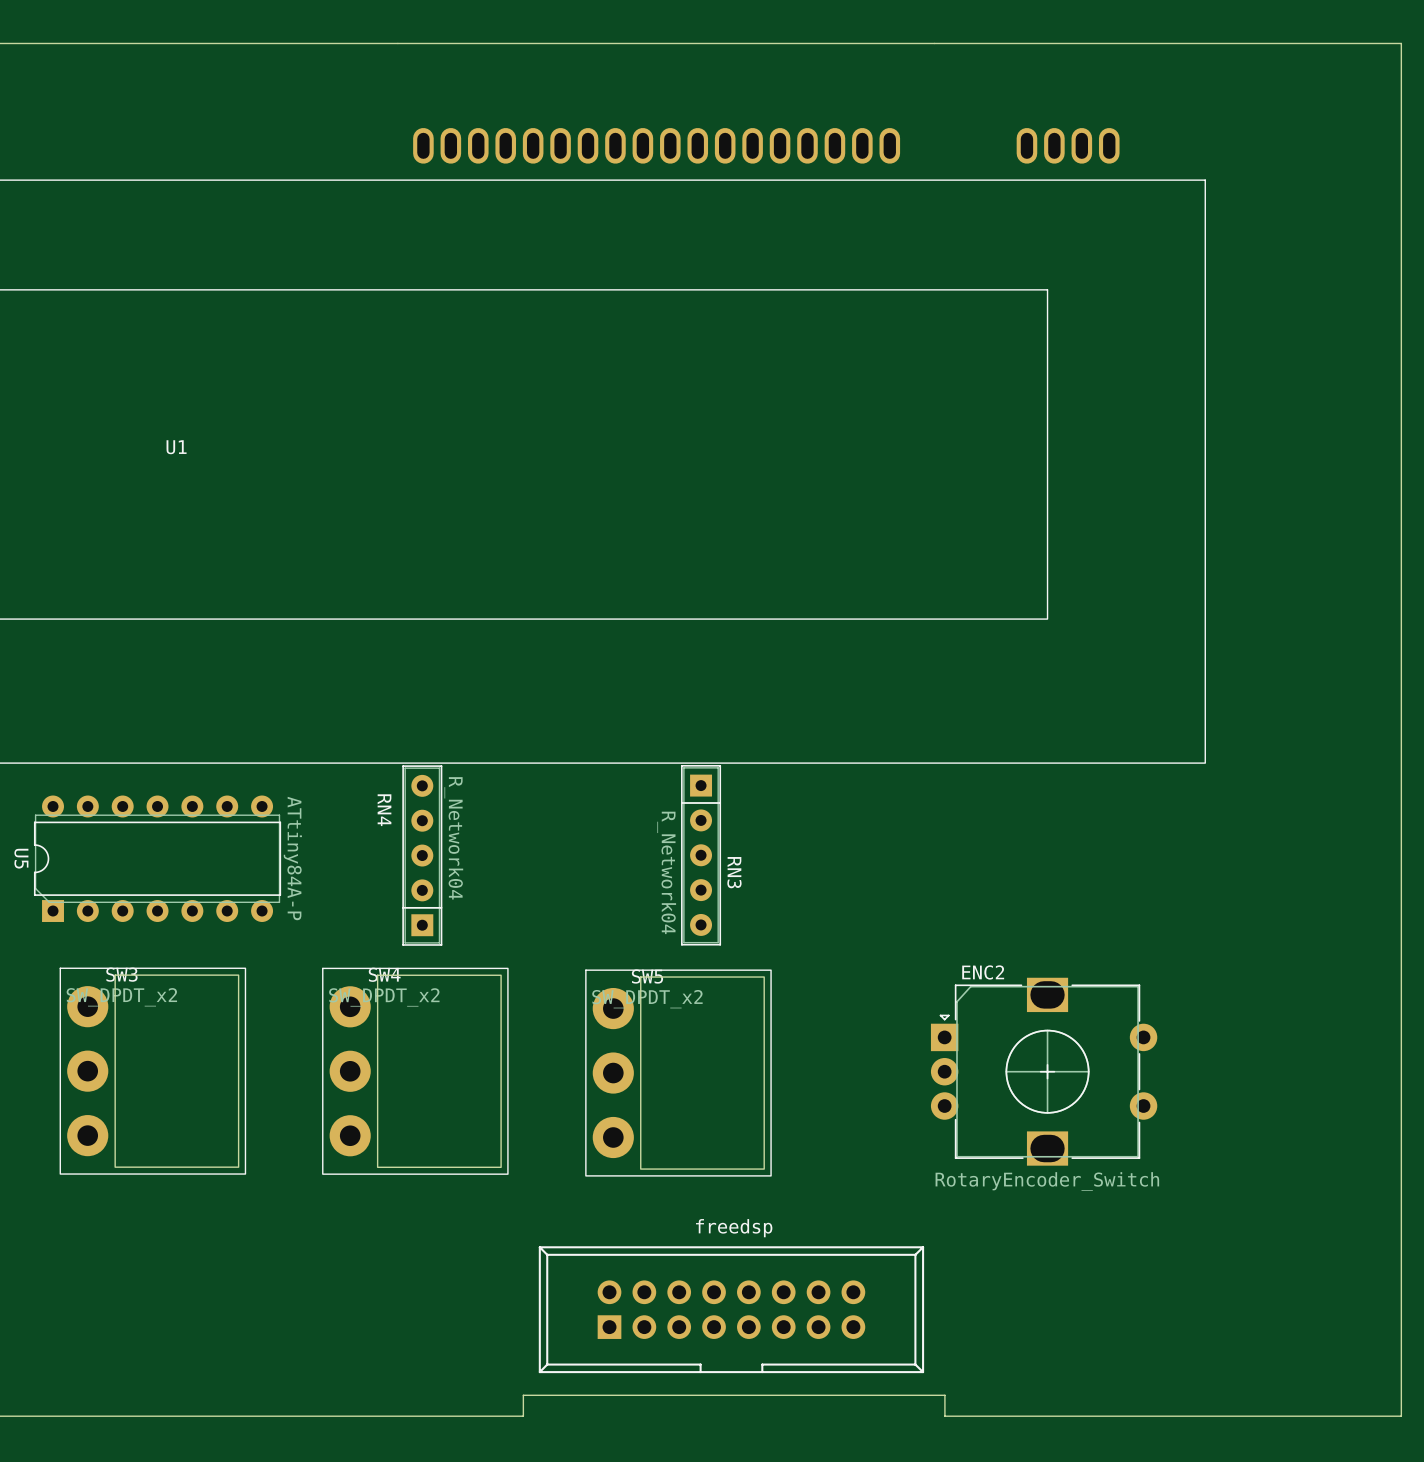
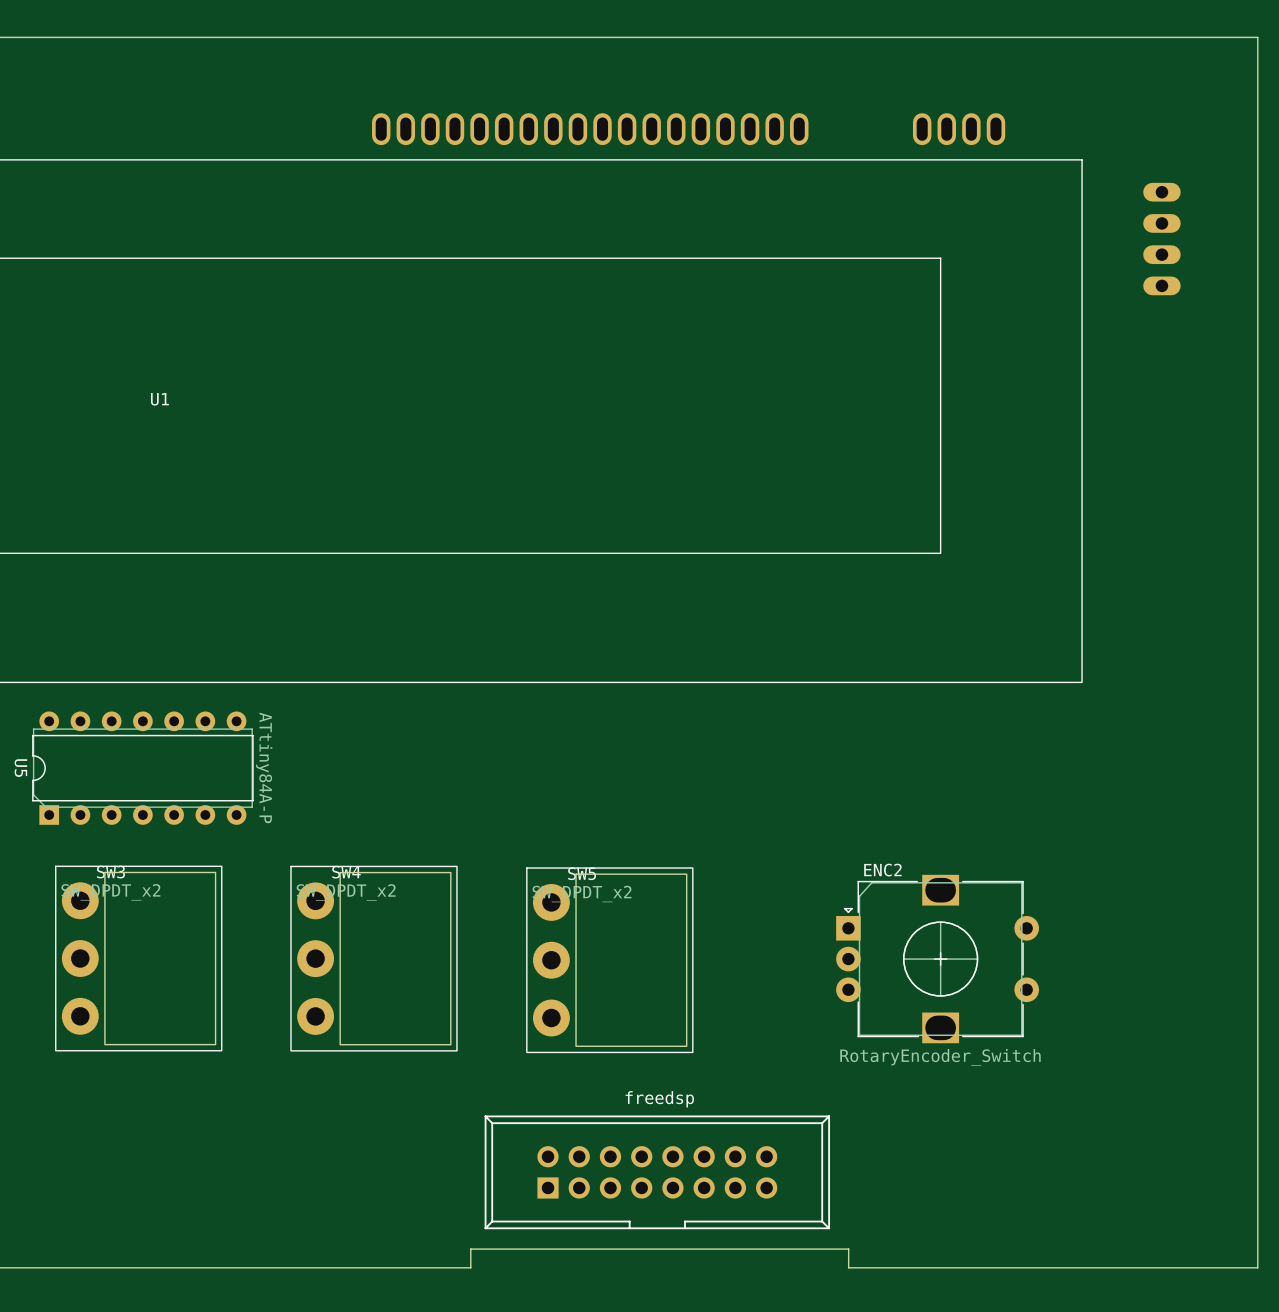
part: none -> (1161, 239)
RN4: R_Network04 (422, 855) -> none
RN3: R_Network04 (701, 855) -> none

